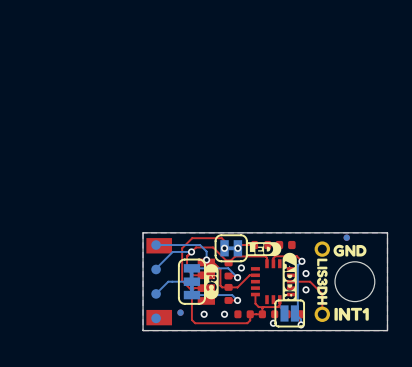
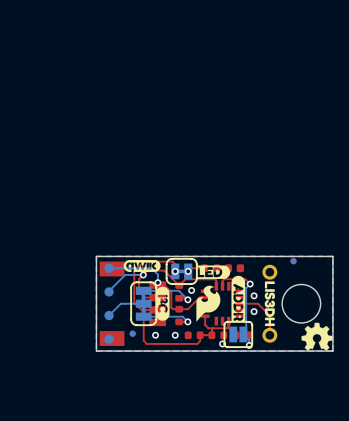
drawing: none -> [123, 259, 161, 272]
drawing: [333, 244, 367, 257] -> none
drawing: none -> [196, 285, 221, 322]
drawing: none -> [301, 322, 333, 351]
drawing: [334, 307, 369, 321] -> none

